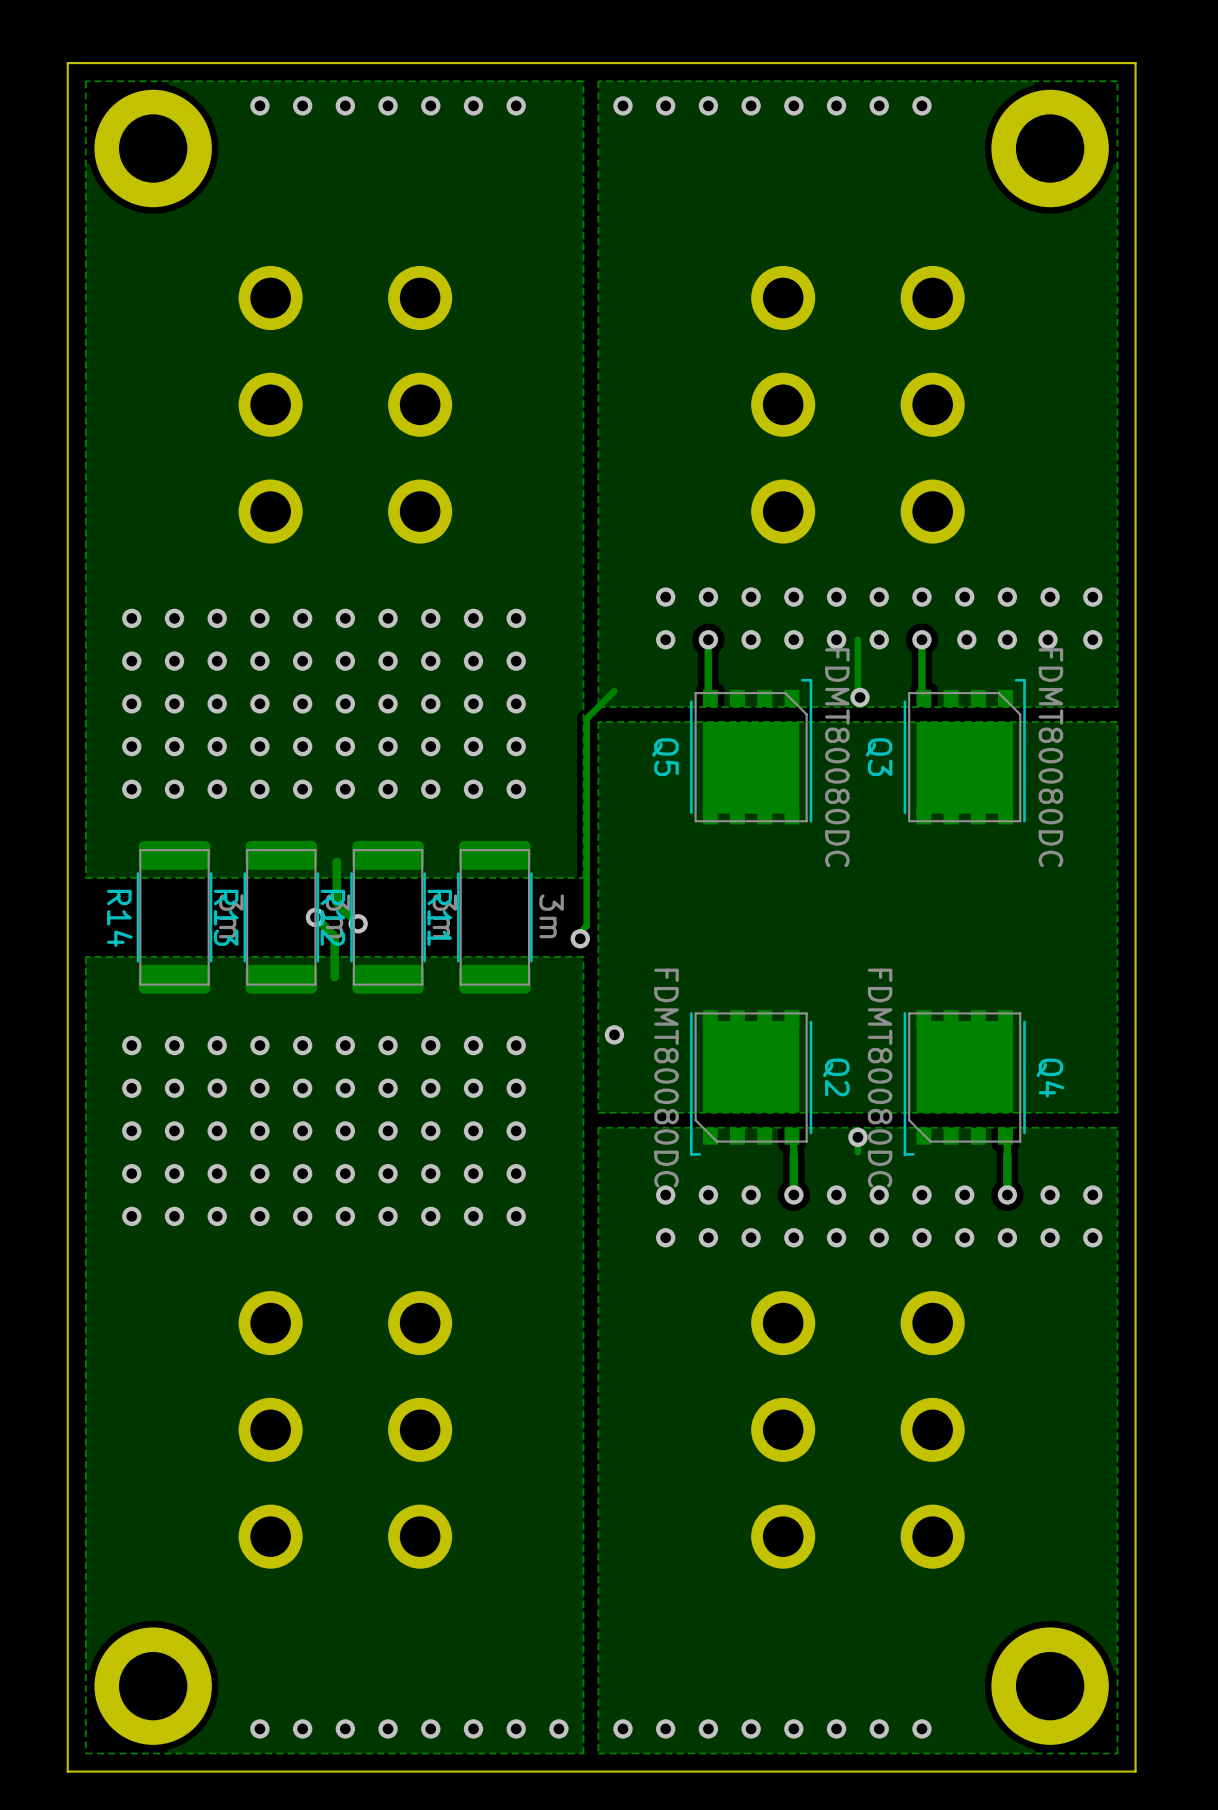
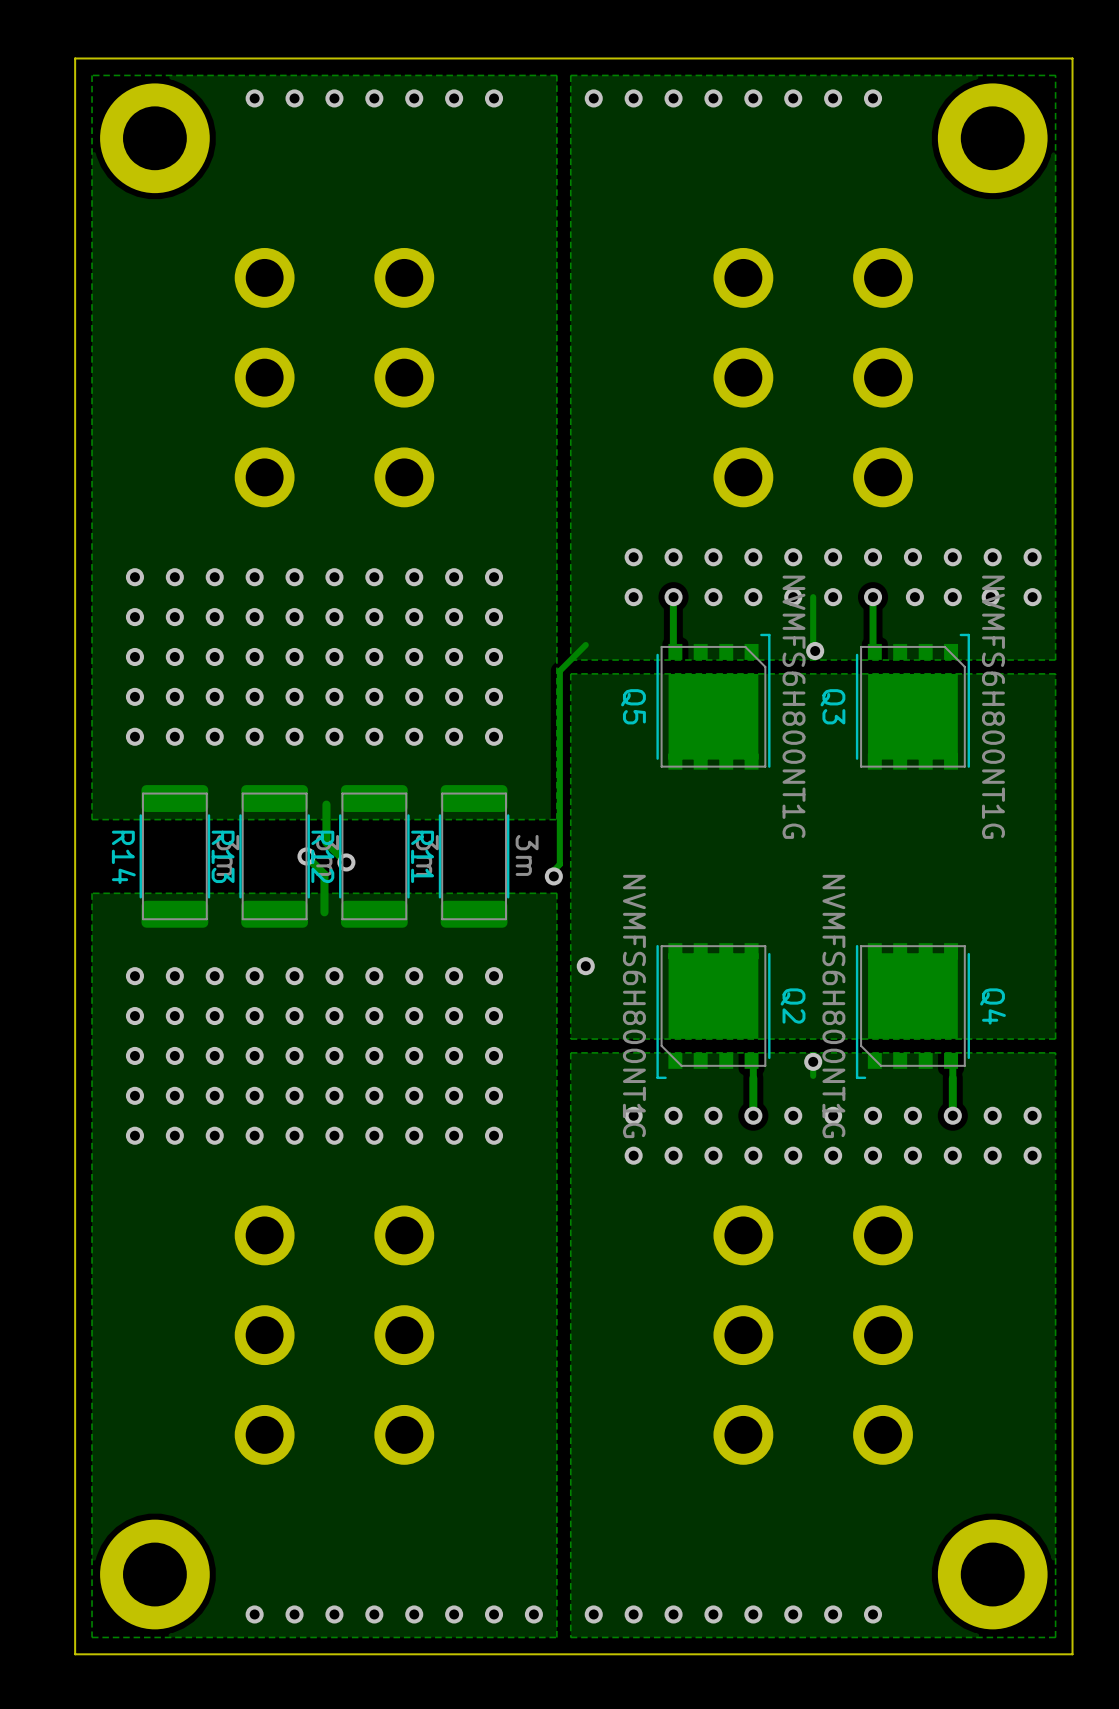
Q5 value: FDMT80080DC (837, 757) -> NVMFS6H800NT1G (794, 707)
Q3 value: FDMT80080DC (1050, 757) -> NVMFS6H800NT1G (993, 707)
Q2 value: FDMT80080DC (666, 1078) -> NVMFS6H800NT1G (634, 1006)
Q4 value: FDMT80080DC (880, 1078) -> NVMFS6H800NT1G (833, 1006)

